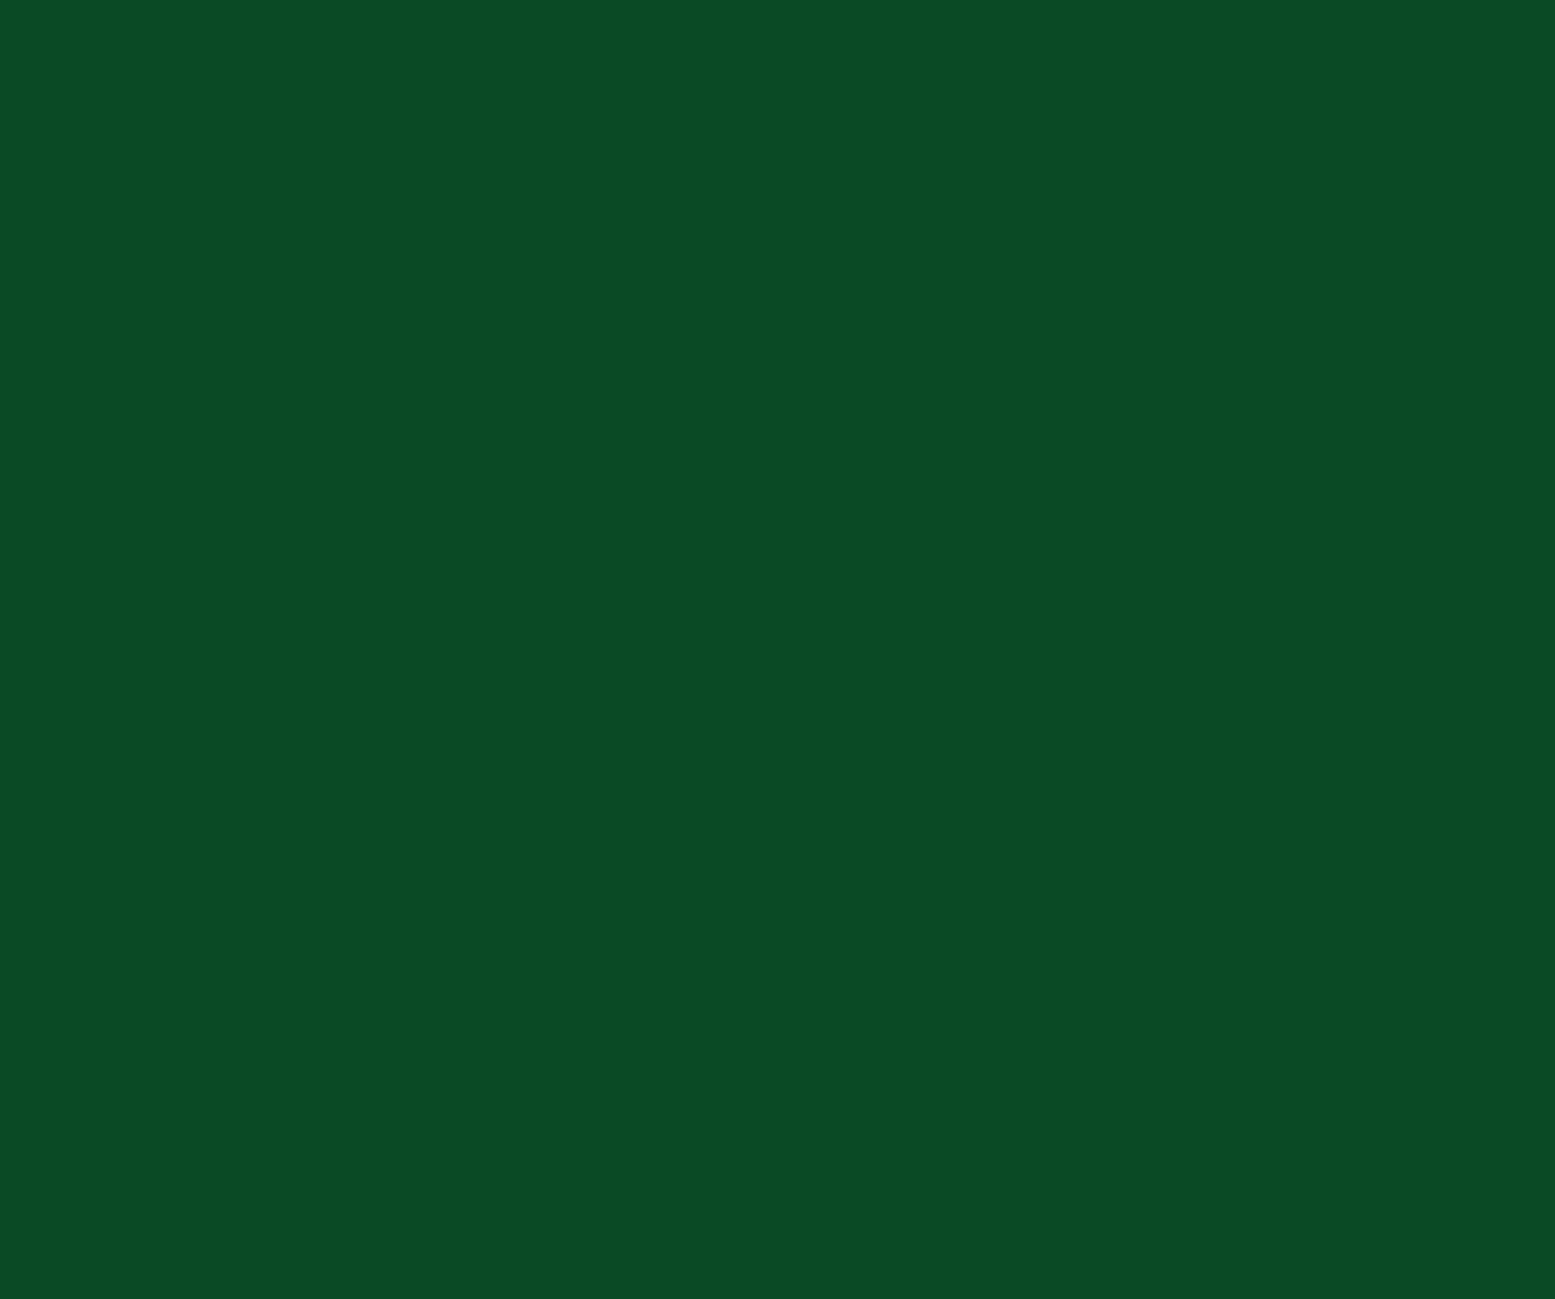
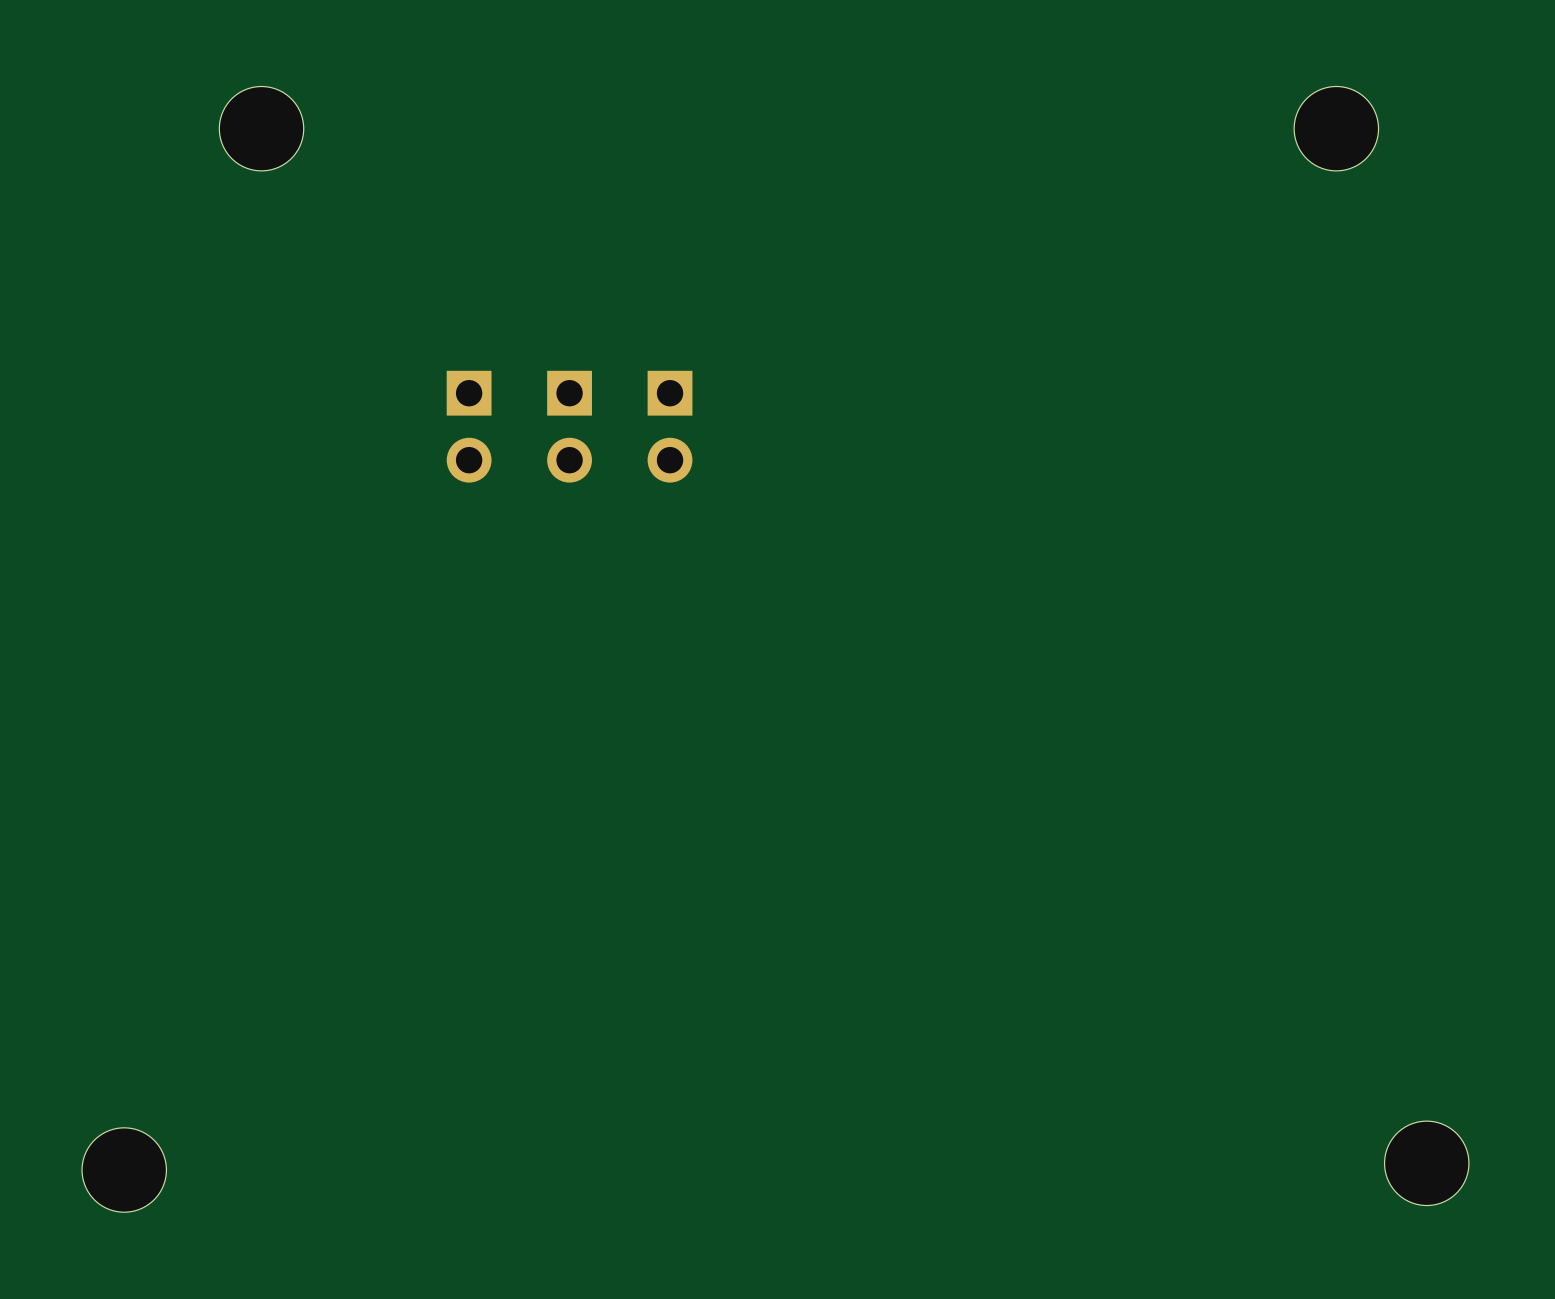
part: none -> (261, 128)
part: none -> (1336, 128)
part: none -> (469, 426)
part: none -> (569, 426)
part: none -> (670, 426)
part: none -> (1426, 1163)
part: none -> (124, 1170)

